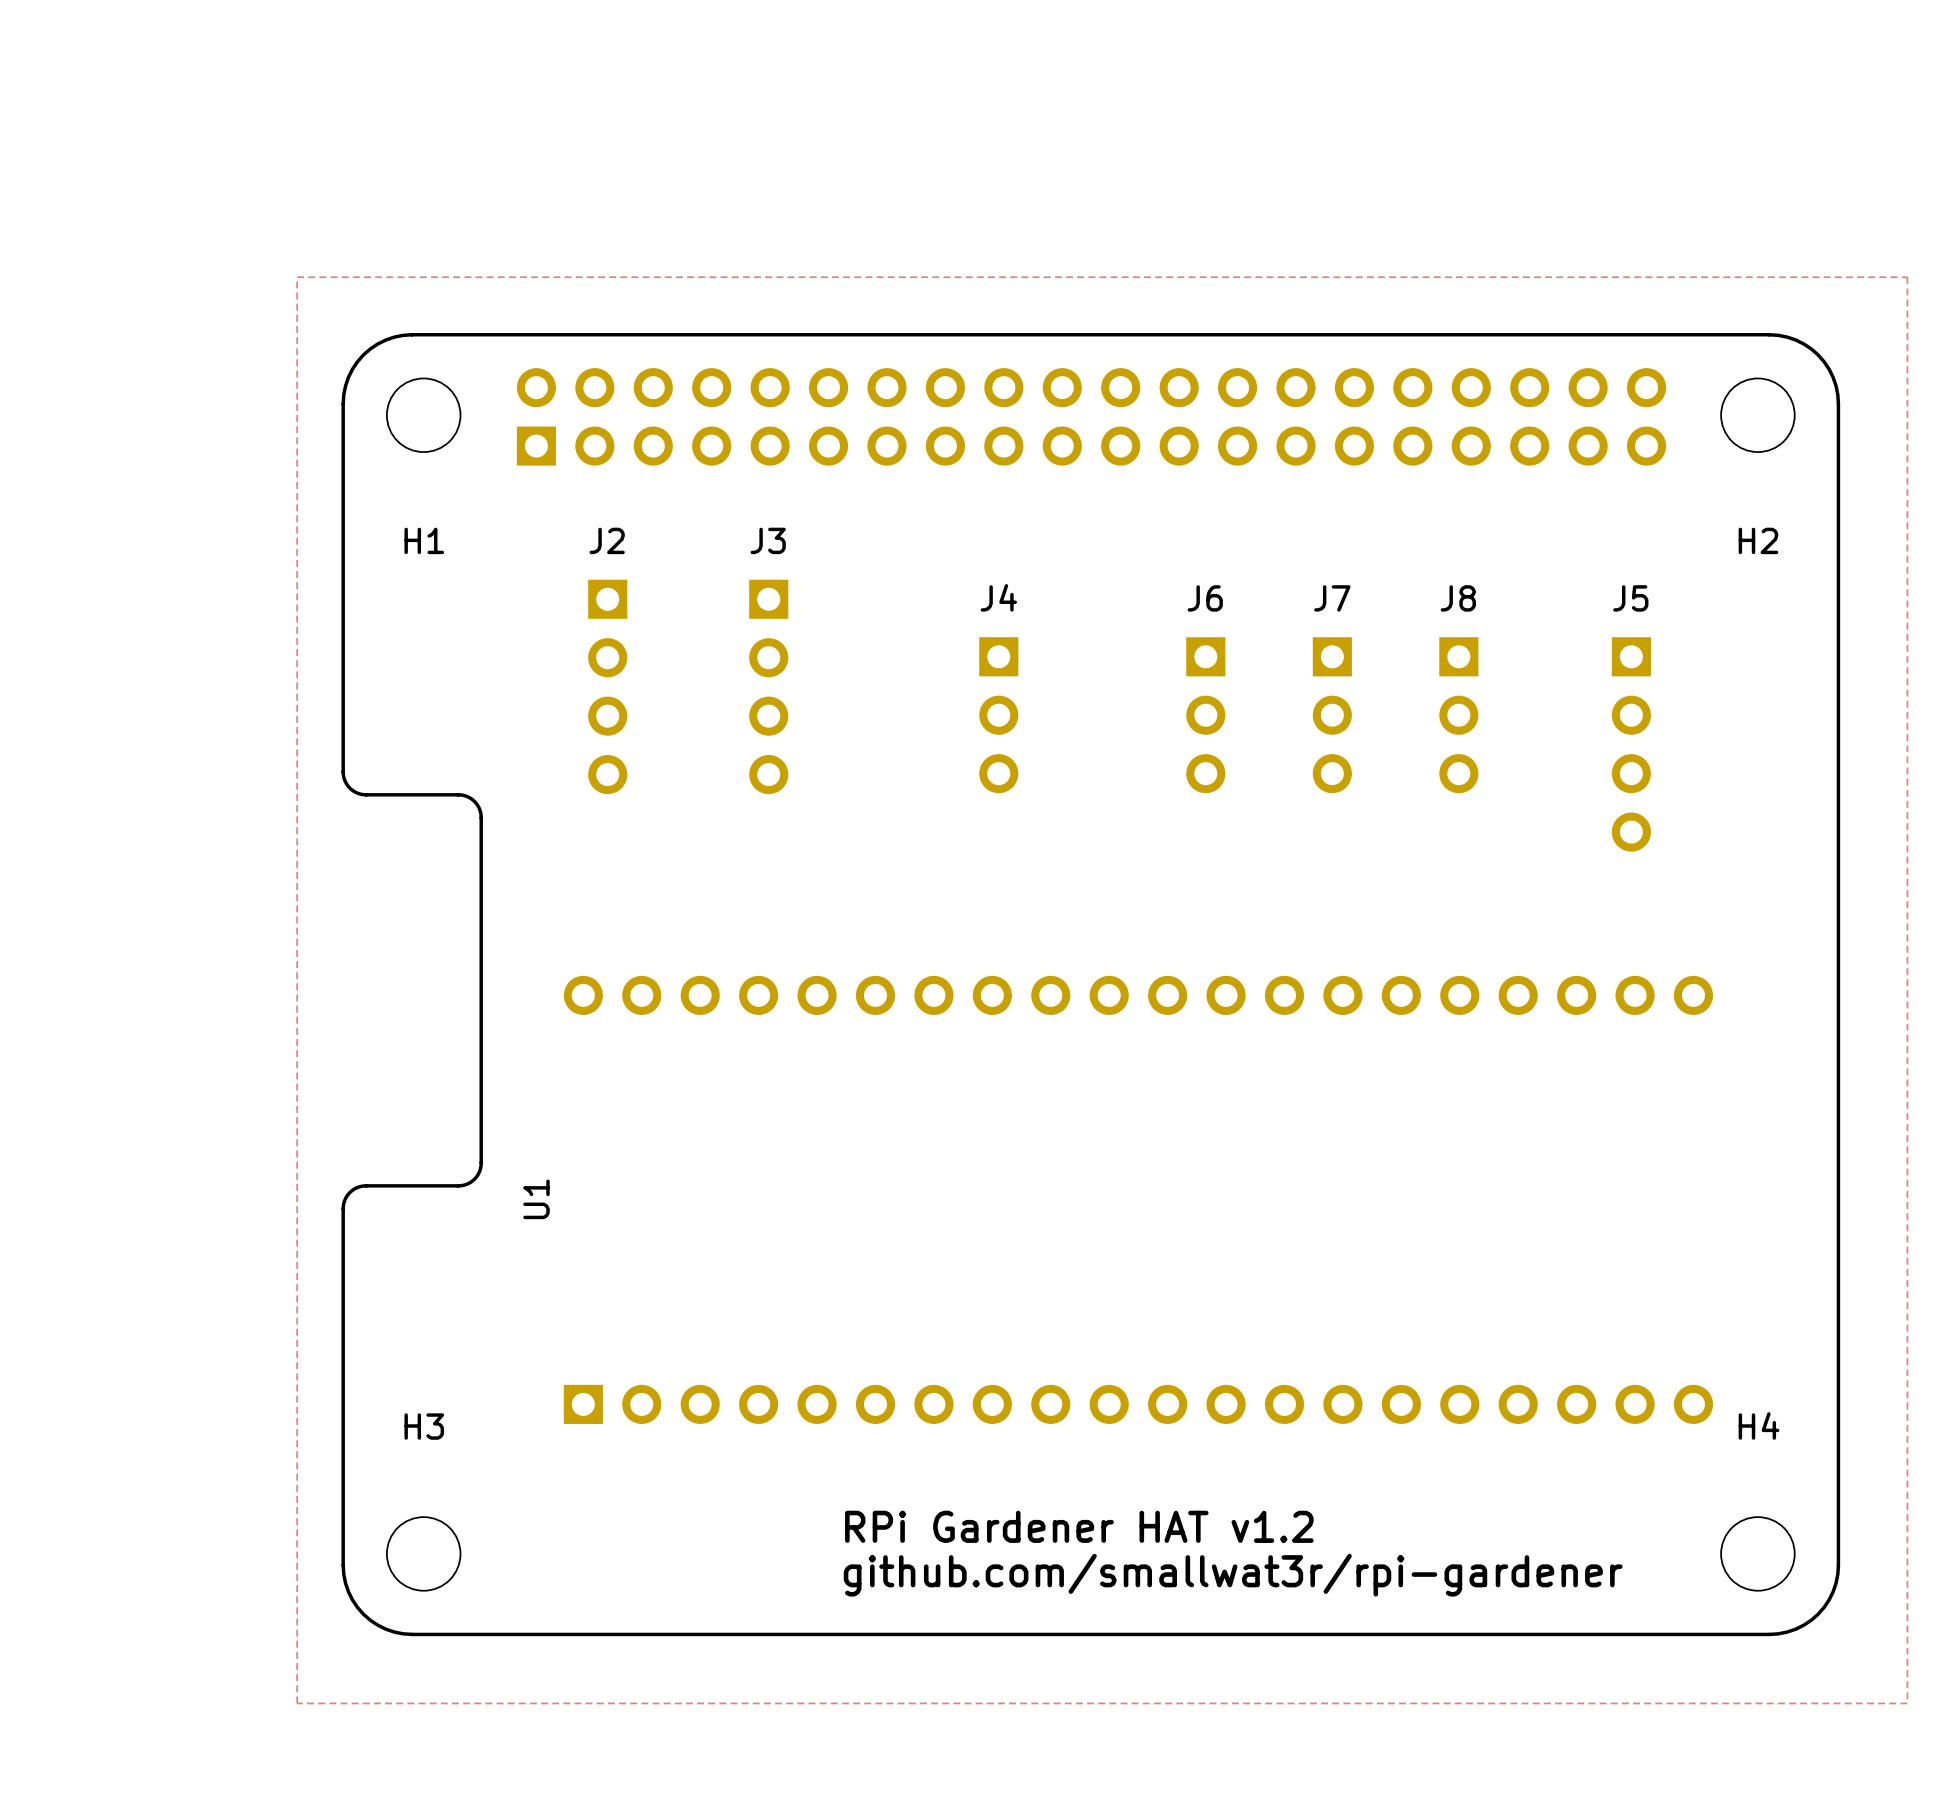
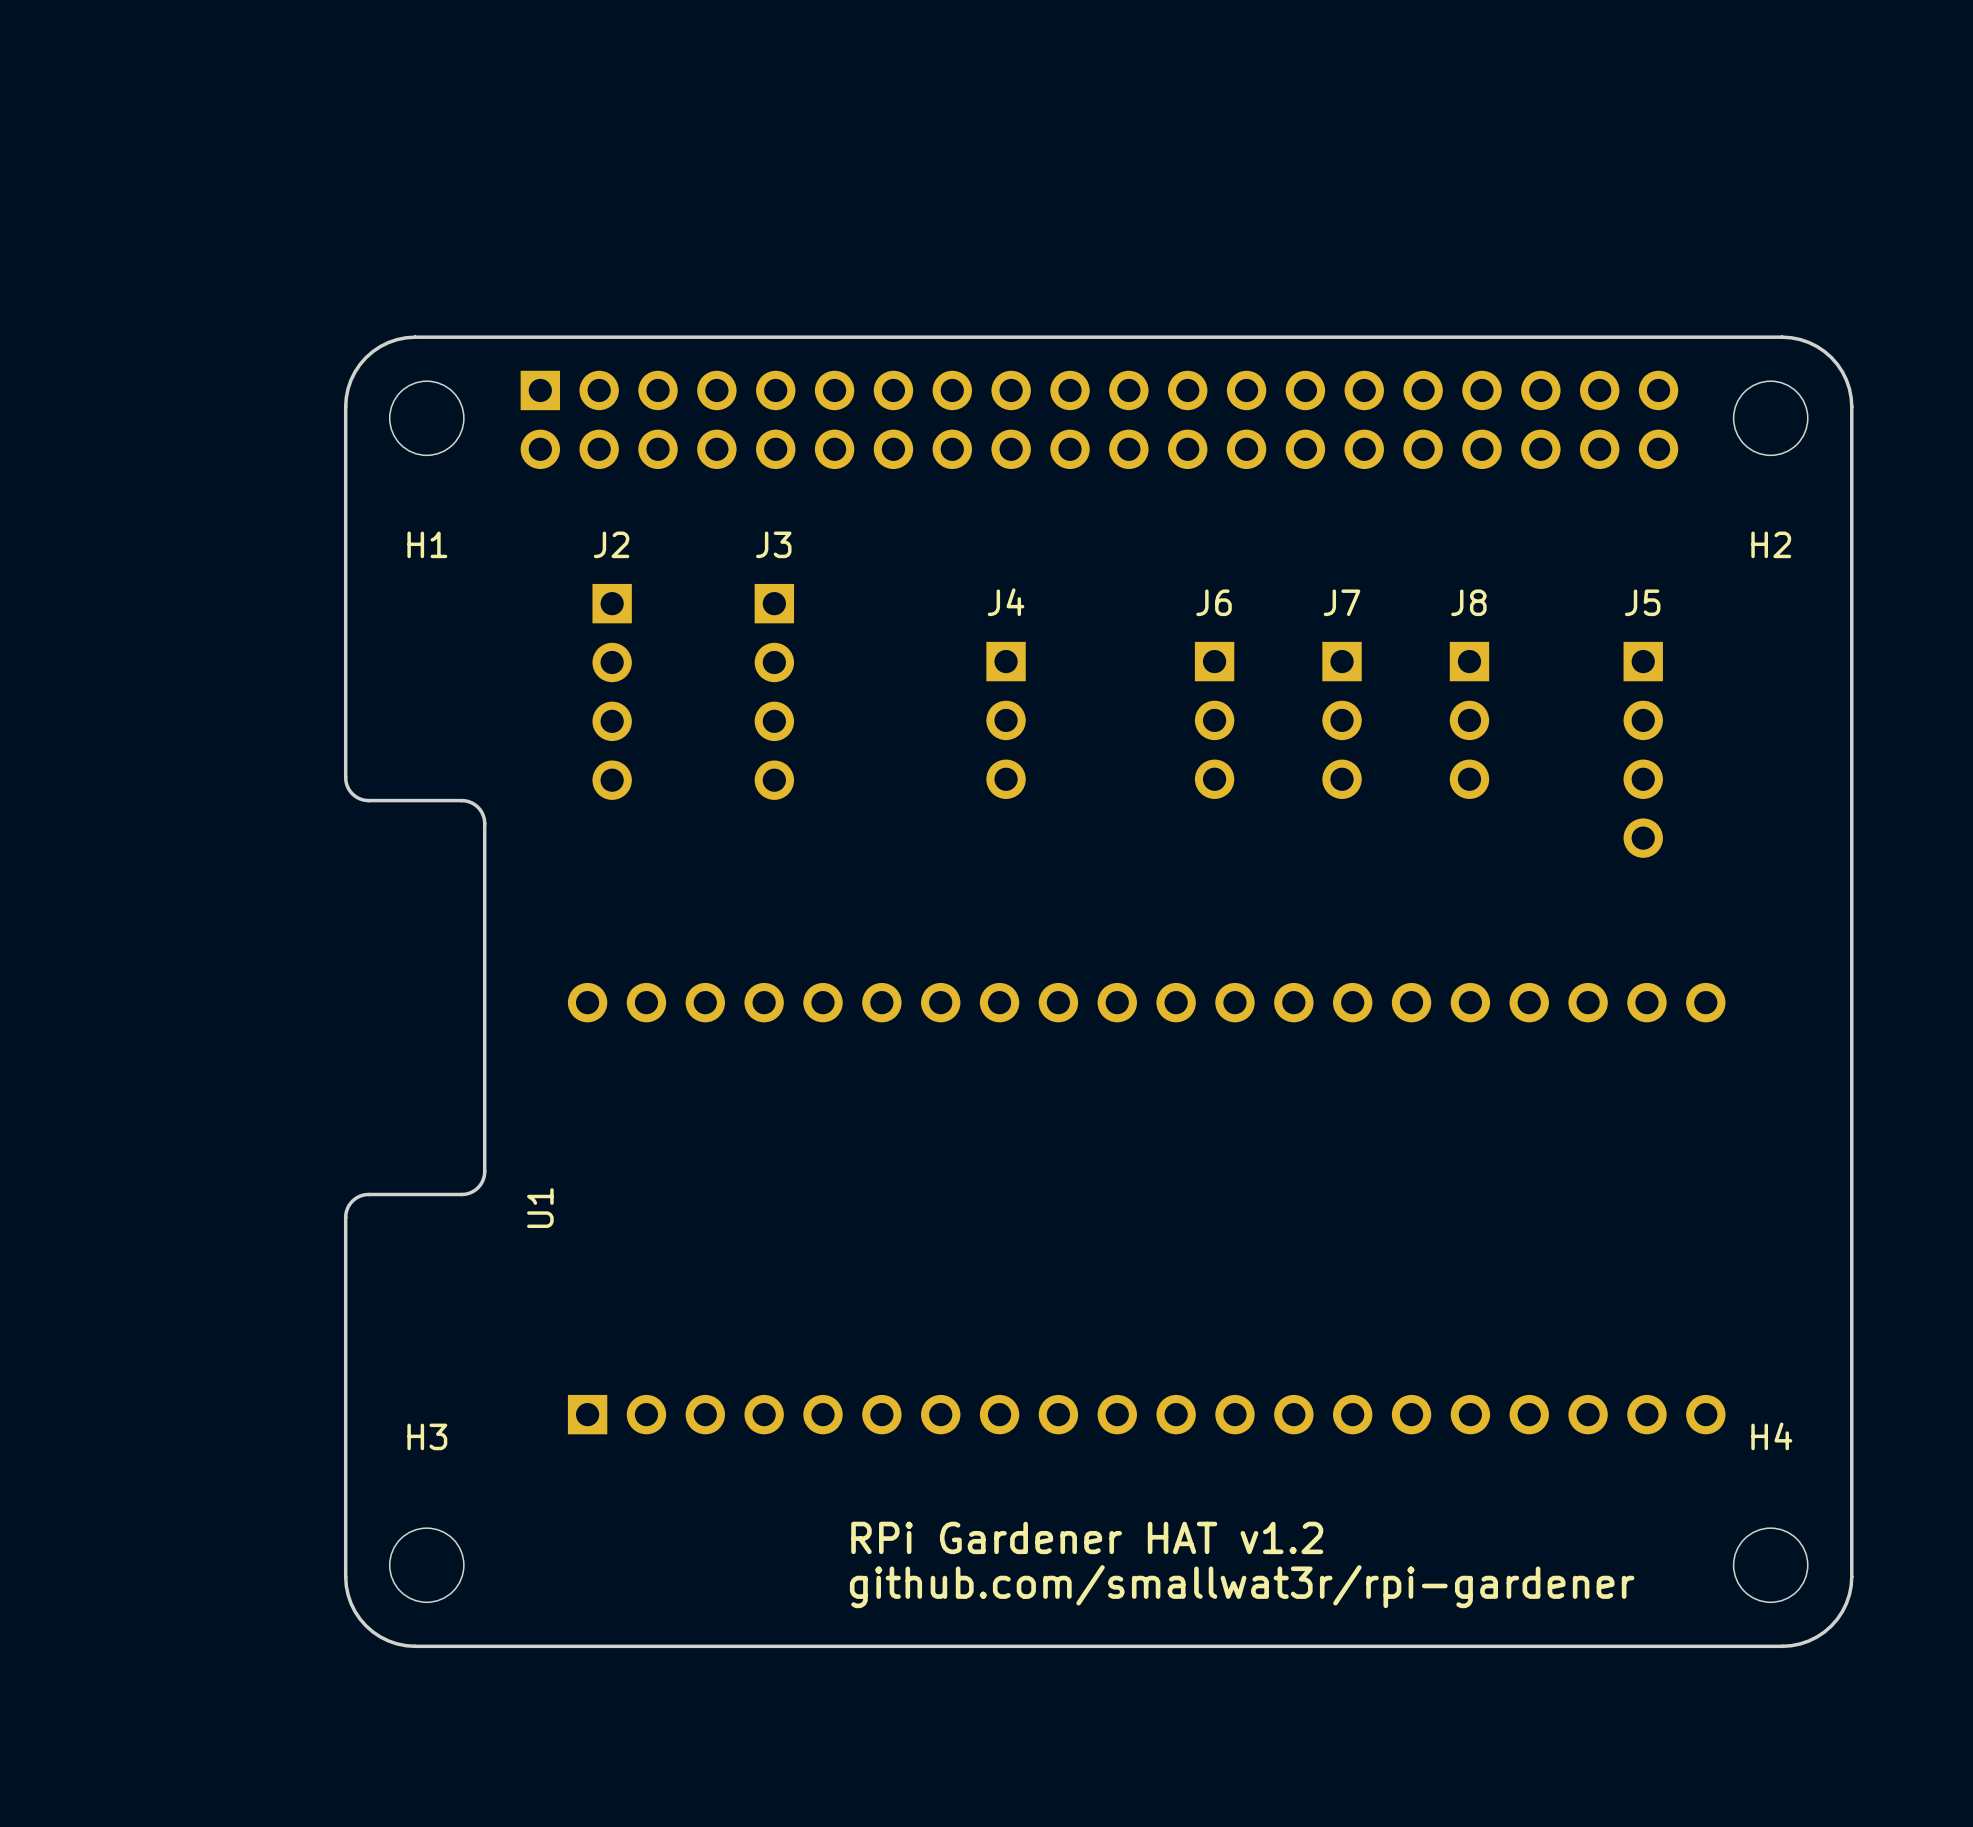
zone outline: (297, 277) (1907, 277) (1907, 1703) (297, 1703) (297, 277) -> none
part footprint: [516, 368, 1667, 466] -> [520, 370, 1679, 470]

